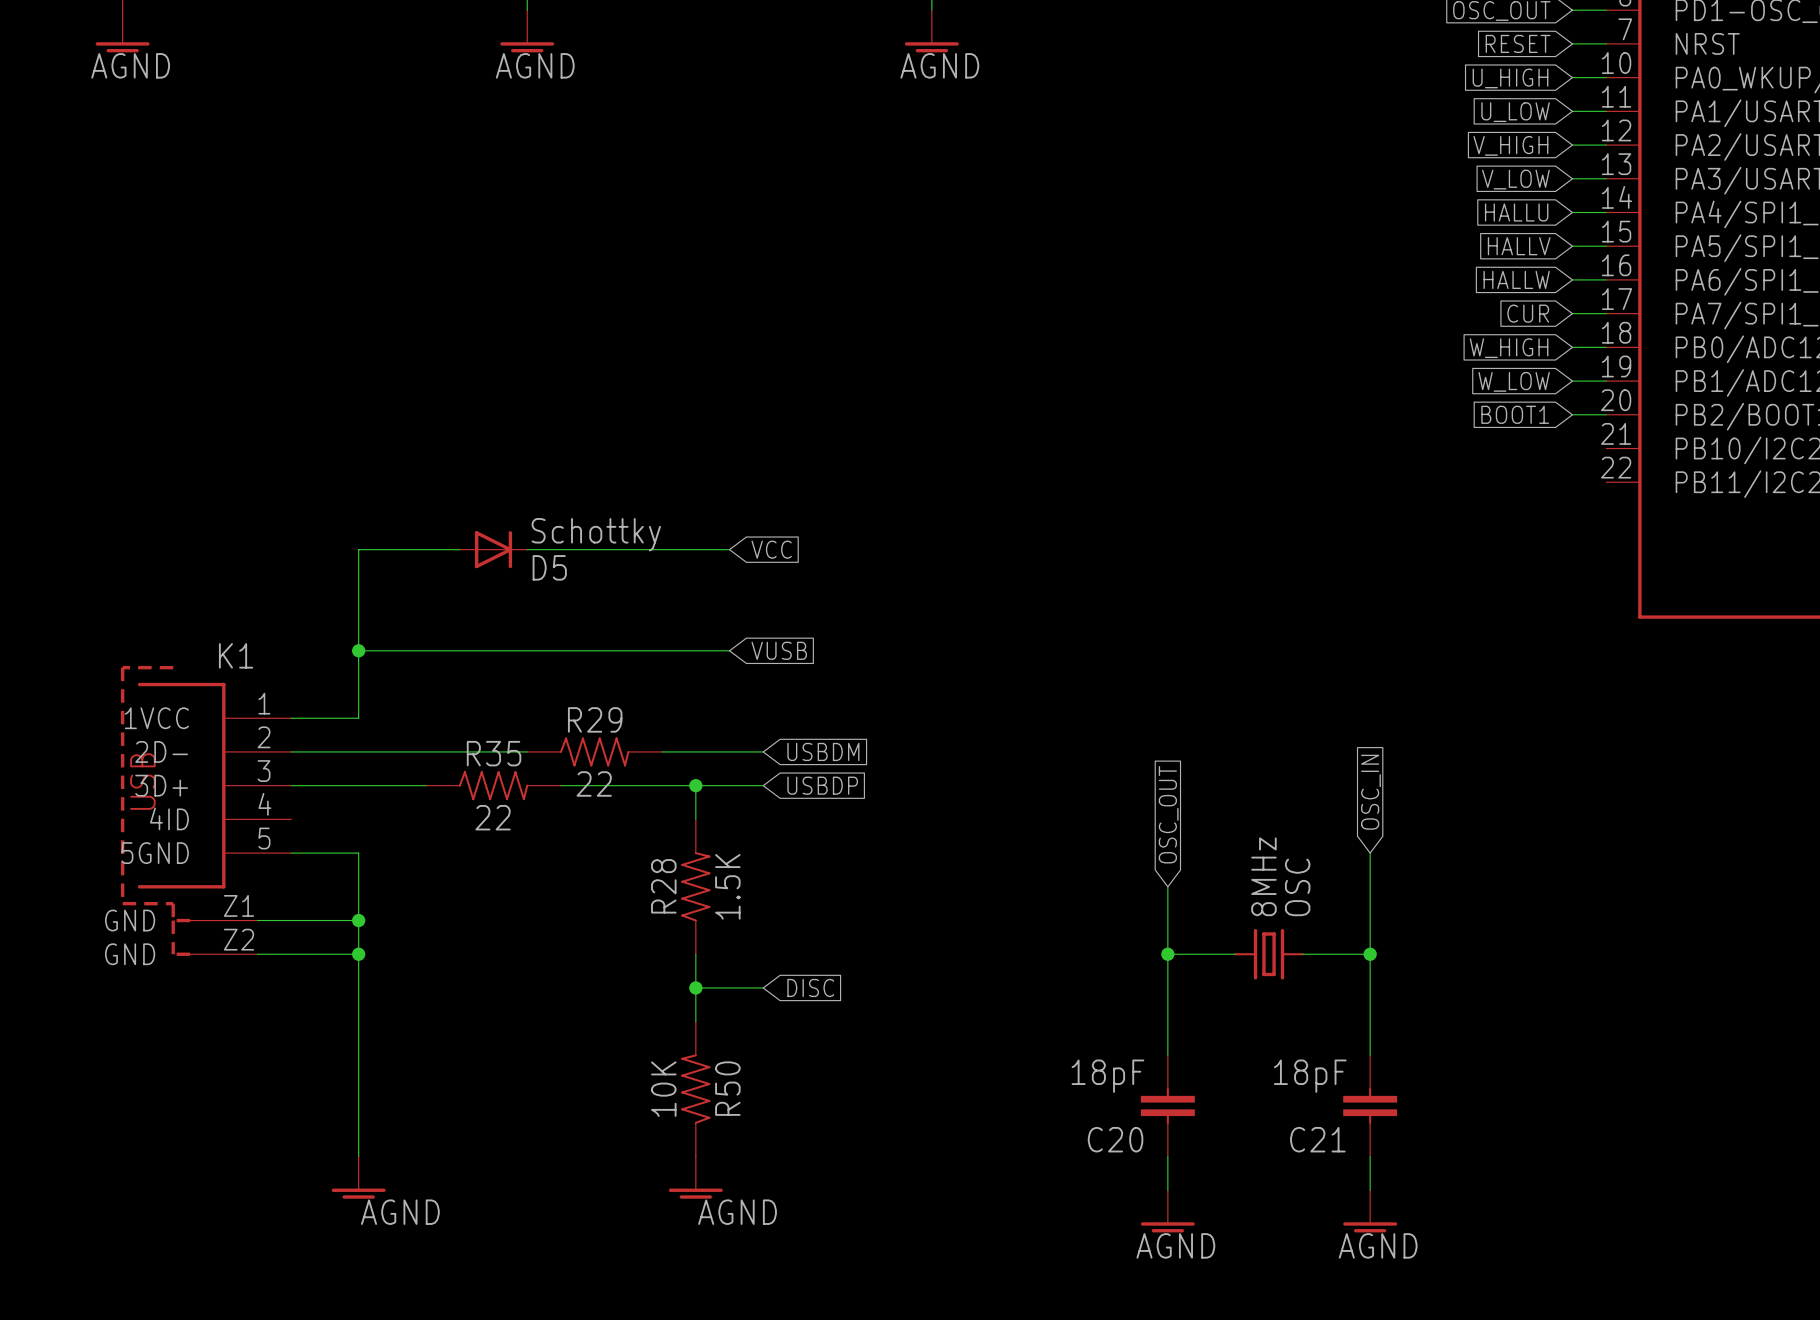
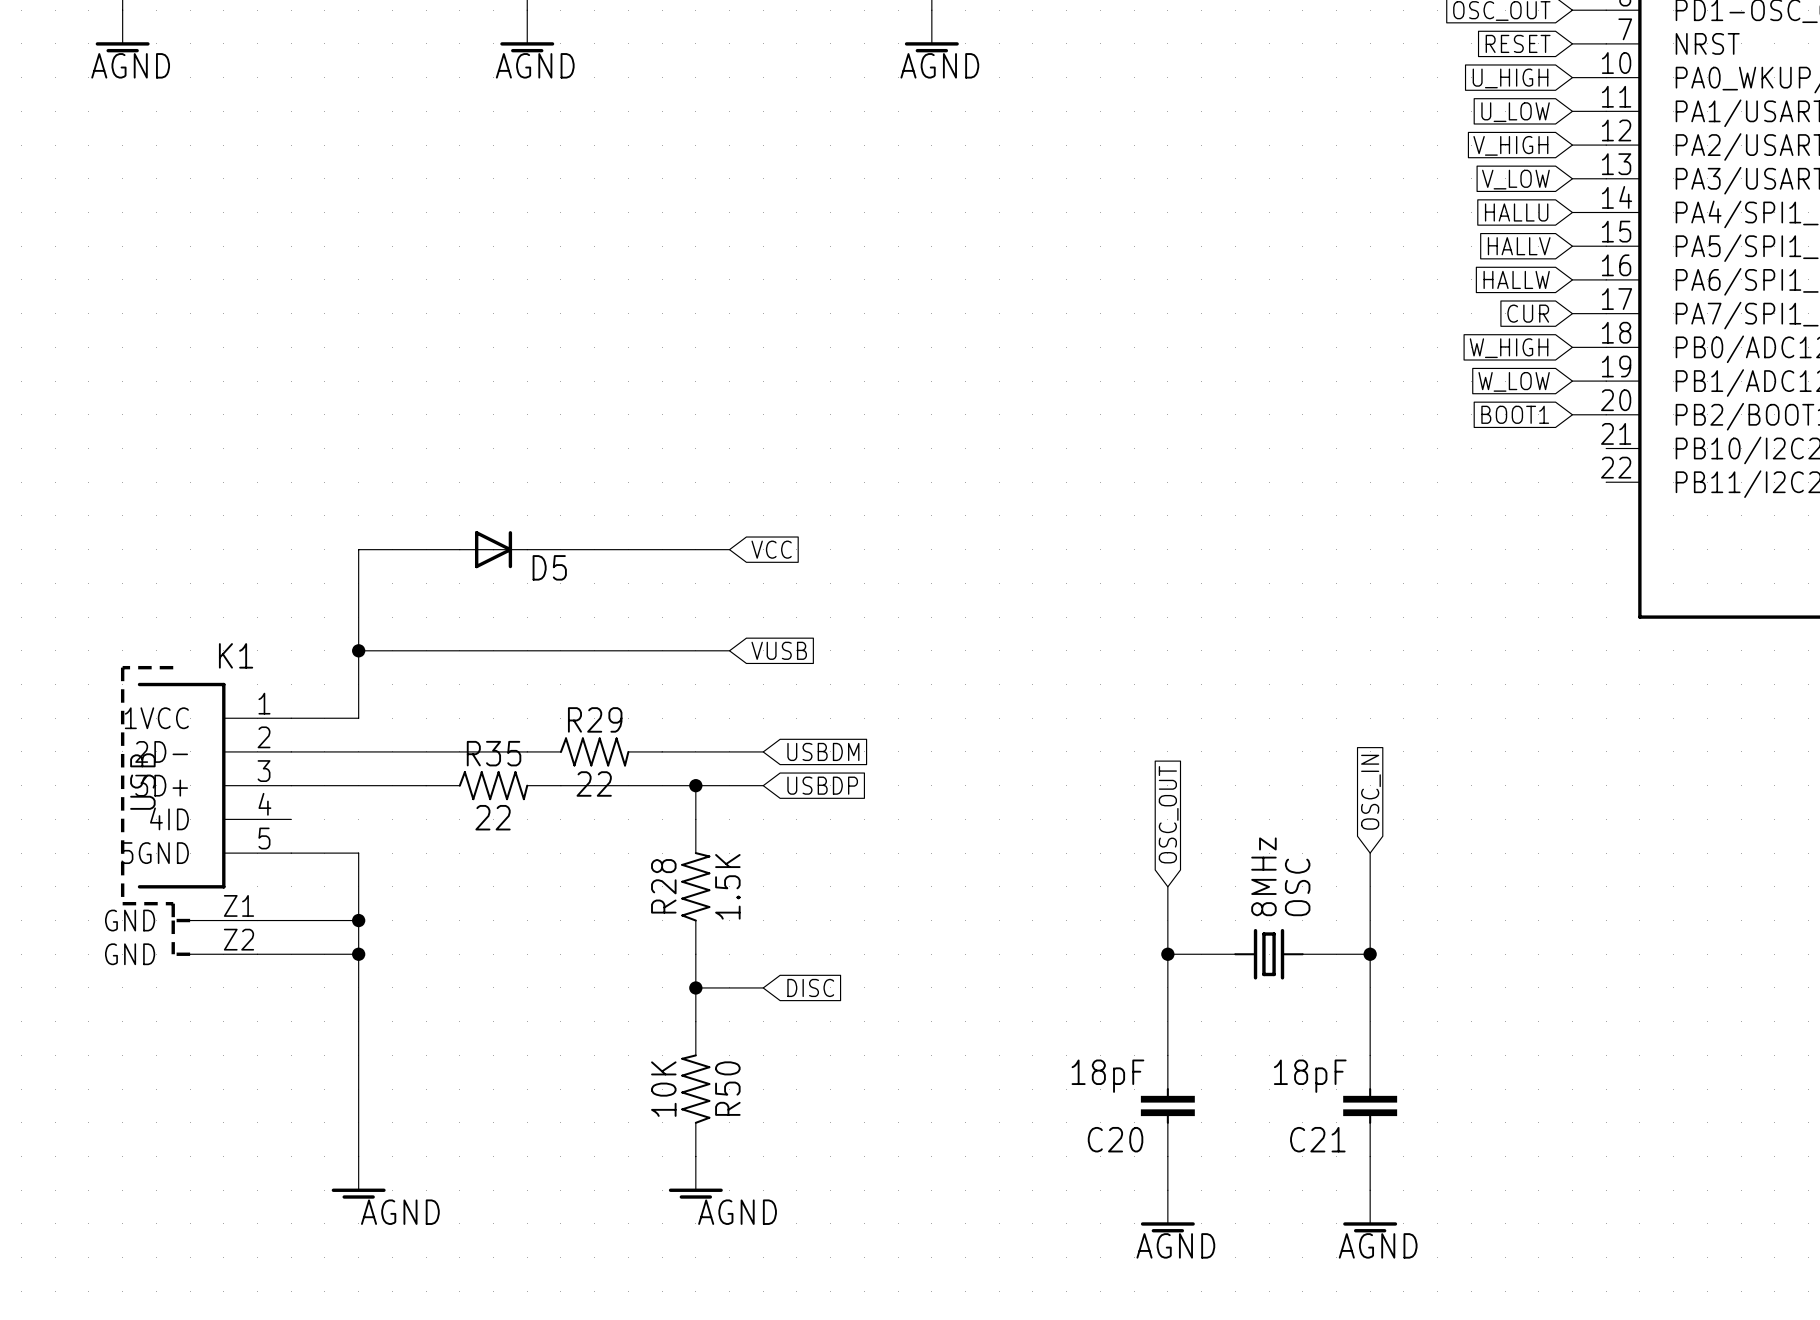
D5 value: Schottky (596, 534) -> none

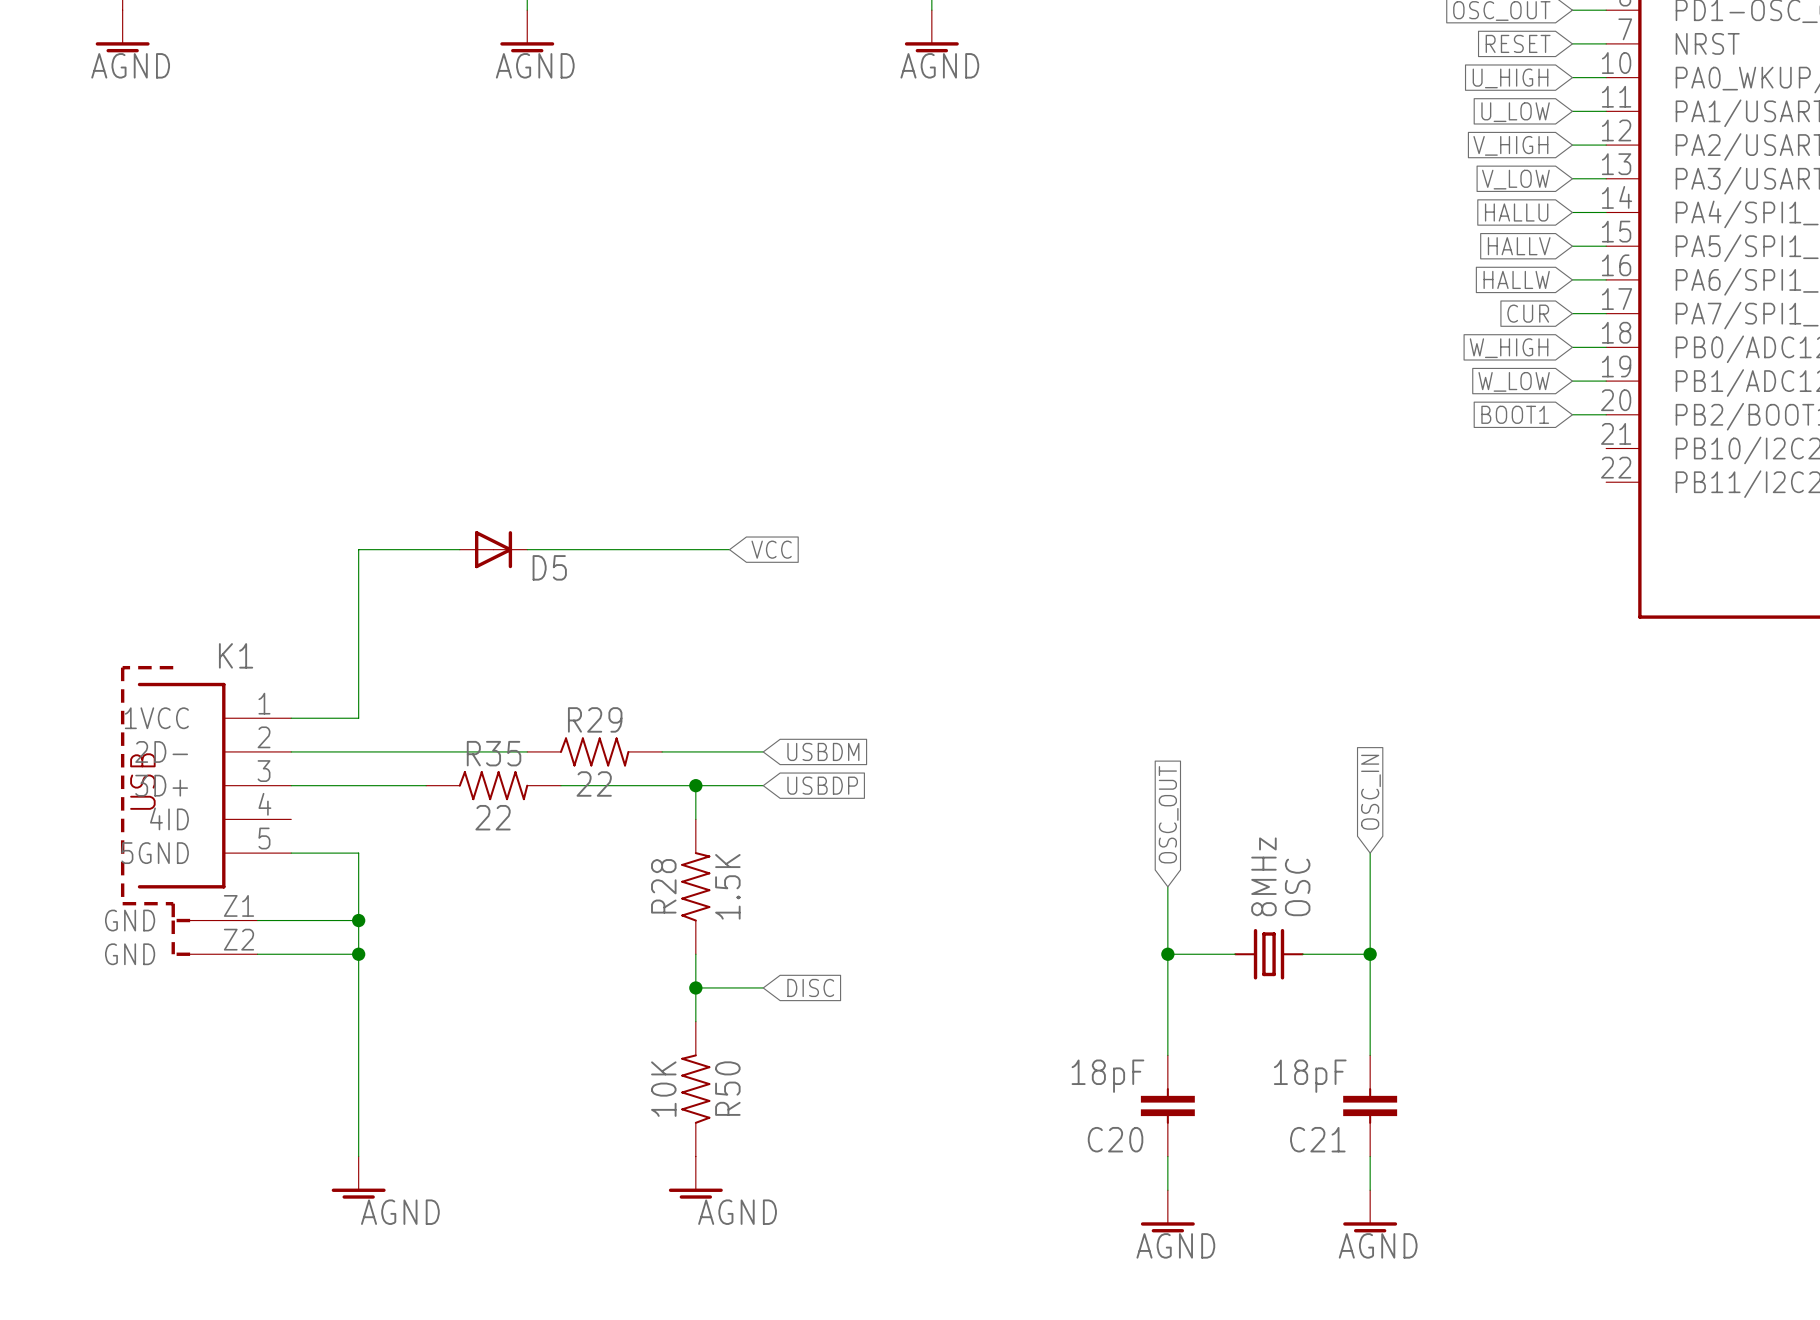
wire: (358, 650) (729, 650) -> none
junction: (358, 650) -> none
global label: VUSB (779, 650) -> none

